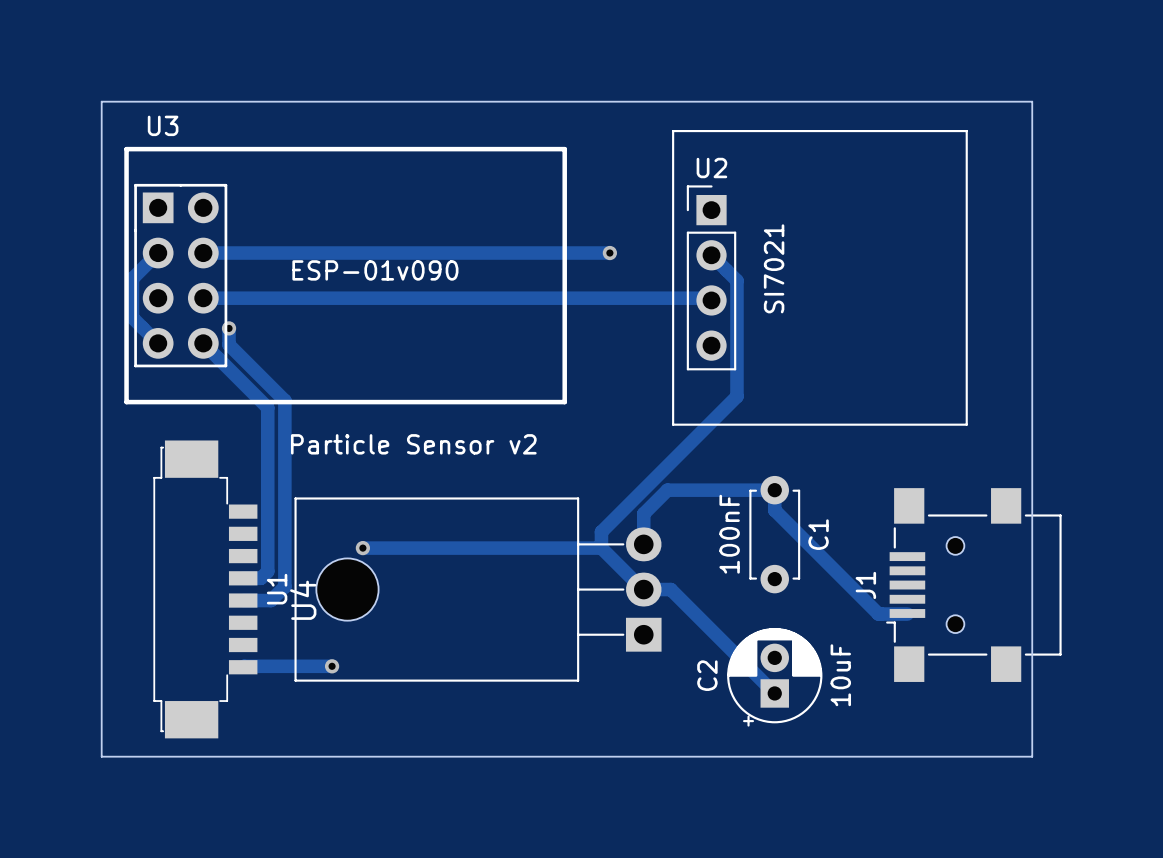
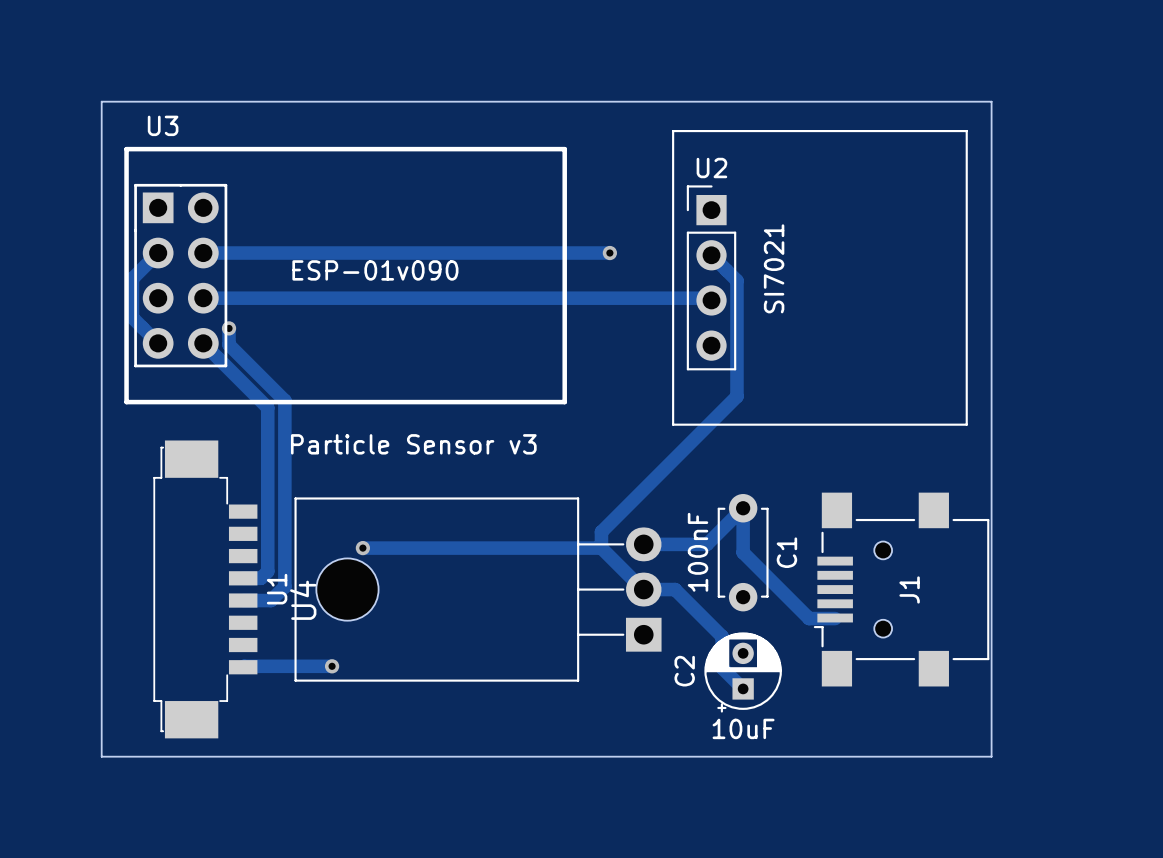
board edge: (991, 101) (1032, 101) (1032, 756) (991, 756) -> (991, 101) (991, 756)
text: Particle Sensor v2 (413, 444) -> Particle Sensor v3 (413, 444)
C1 position: (774, 534) -> (743, 552)
track: (643, 544) (643, 513) (667, 490) (774, 490) (774, 510) (878, 614) (907, 614) -> (643, 544) (707, 544) (743, 508) (743, 552) (809, 618) (835, 618)
J1 name position: J1 (865, 585) -> J1 (909, 589)
J1 position: (973, 585) -> (901, 589)
track: (670, 589) (774, 693) -> (670, 589) (675, 589) (722, 636) (722, 667) (743, 688)
C2 footprint: [727, 628, 823, 727] -> [704, 632, 782, 713]
C2 value position: 10uF (840, 675) -> 10uF (743, 728)

